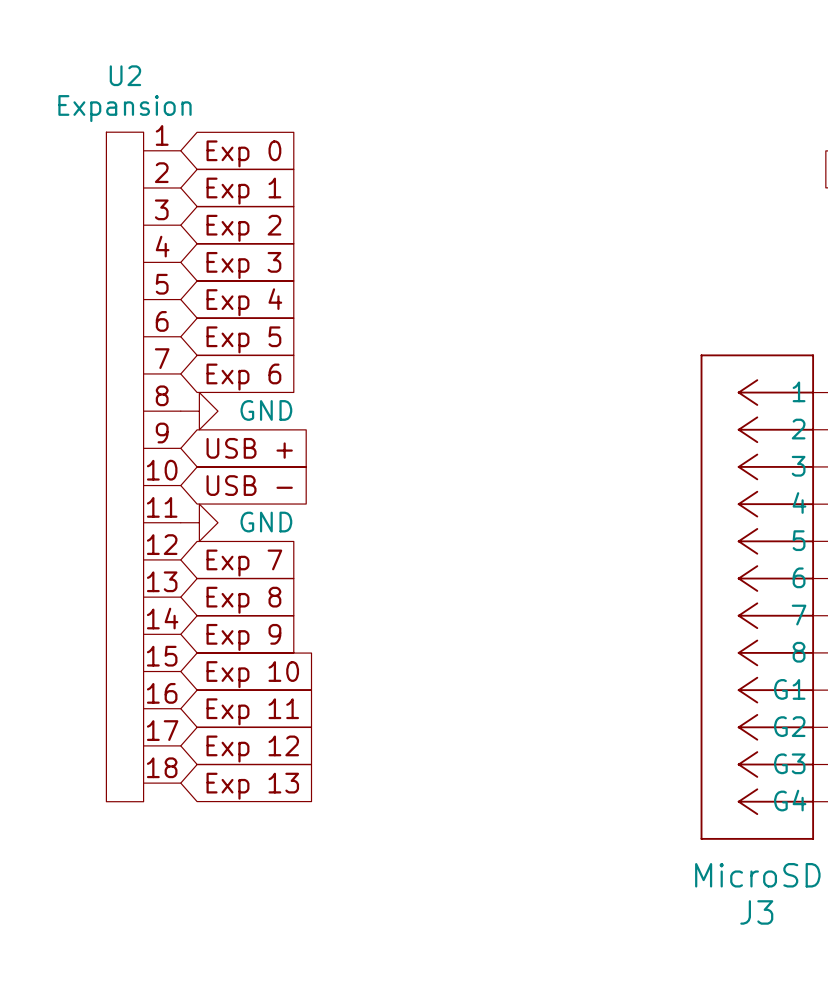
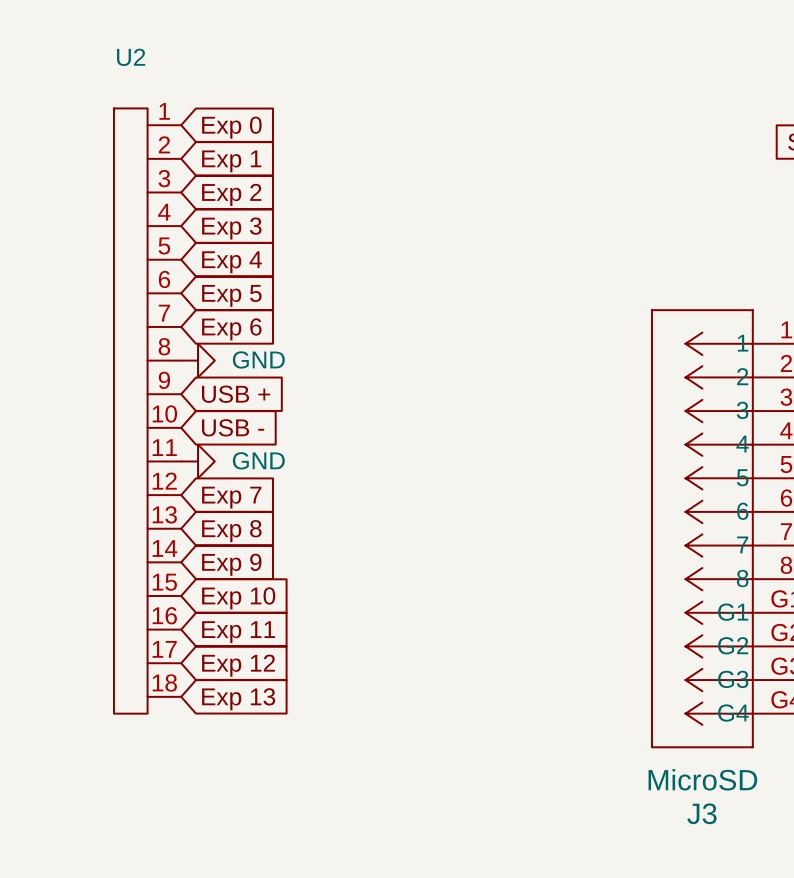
U2 value: Expansion (124, 108) -> none

